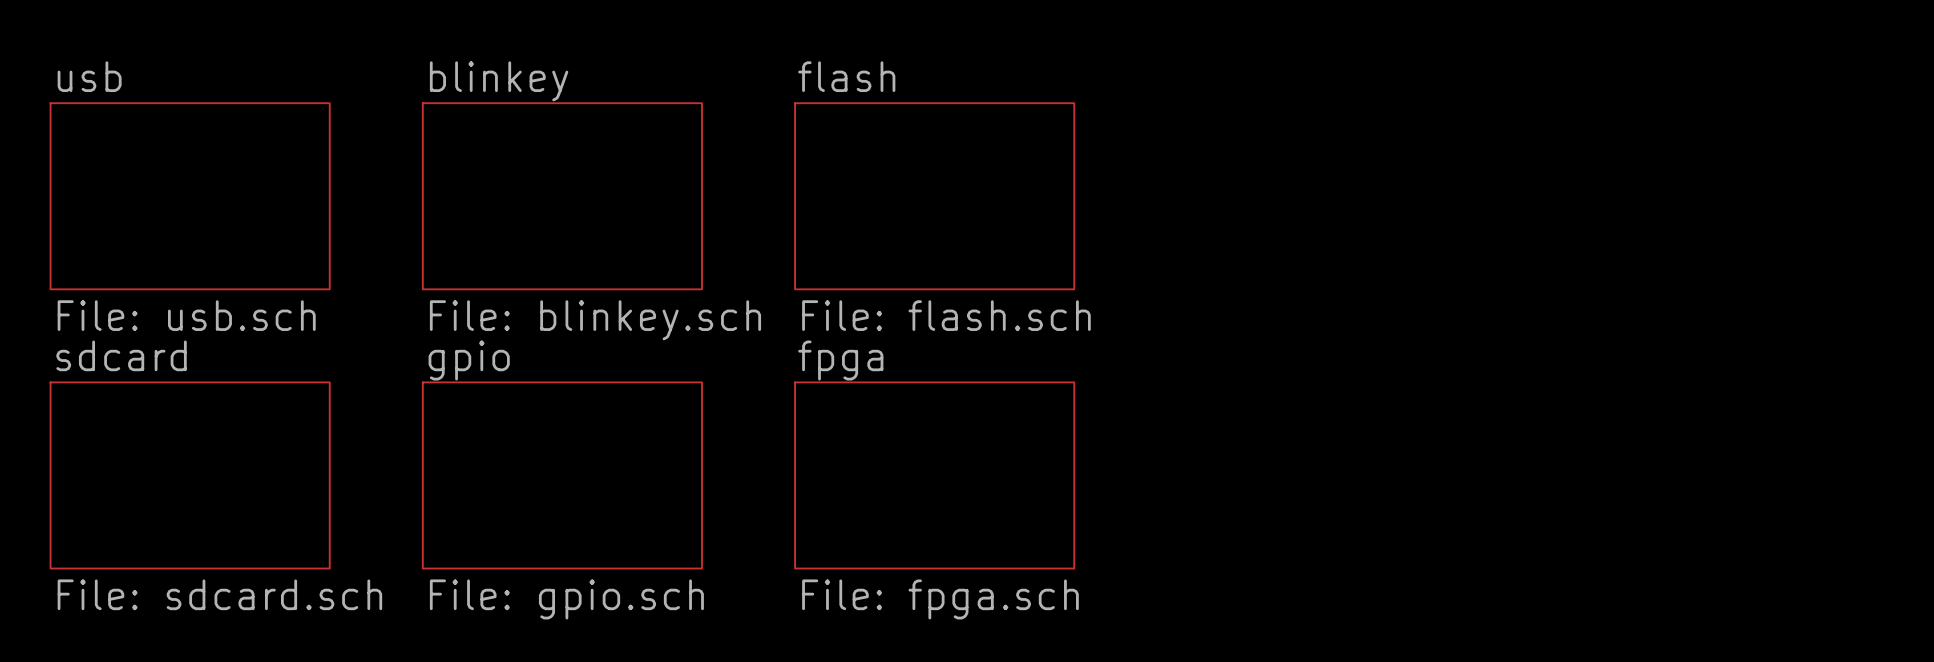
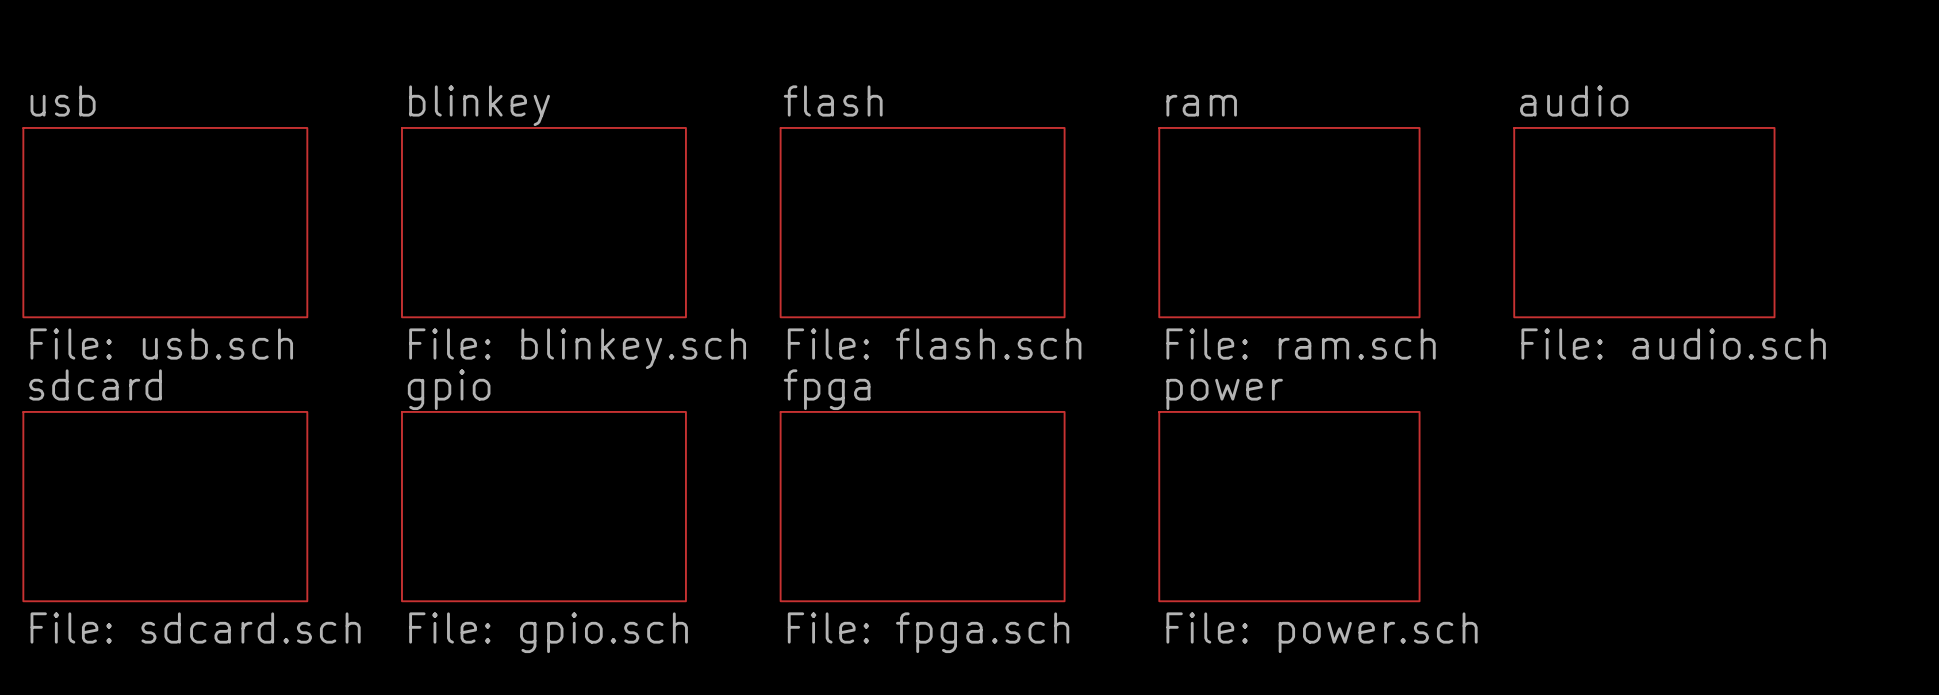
sheet ram: none -> File: ram.sch (1289, 222)
sheet audio: none -> File: audio.sch (1644, 222)
sheet power: none -> File: power.sch (1289, 506)

